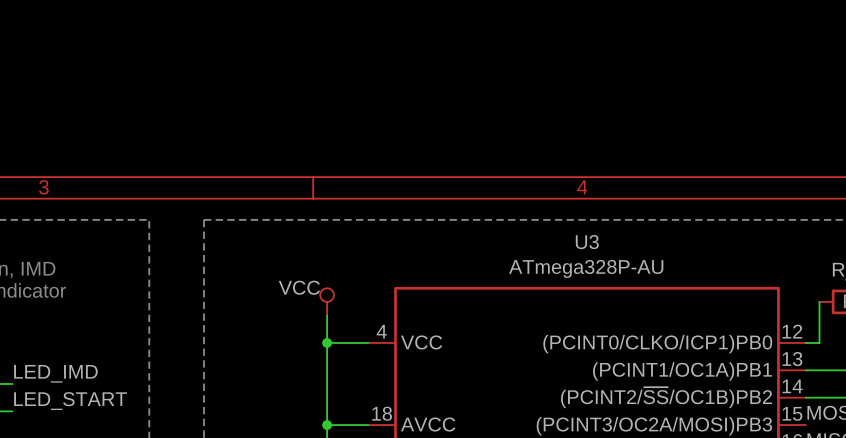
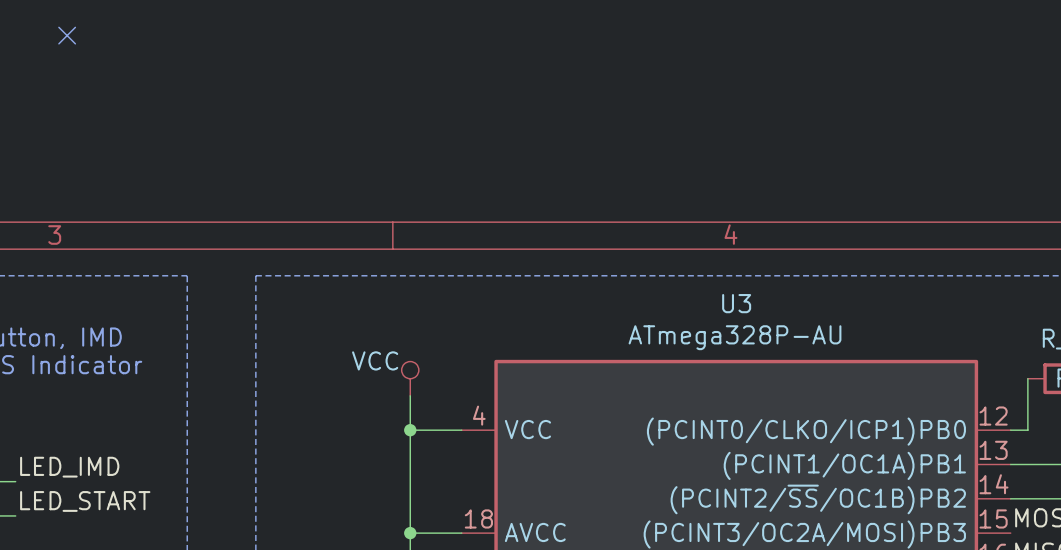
no-connect mark: none -> (67, 35)

